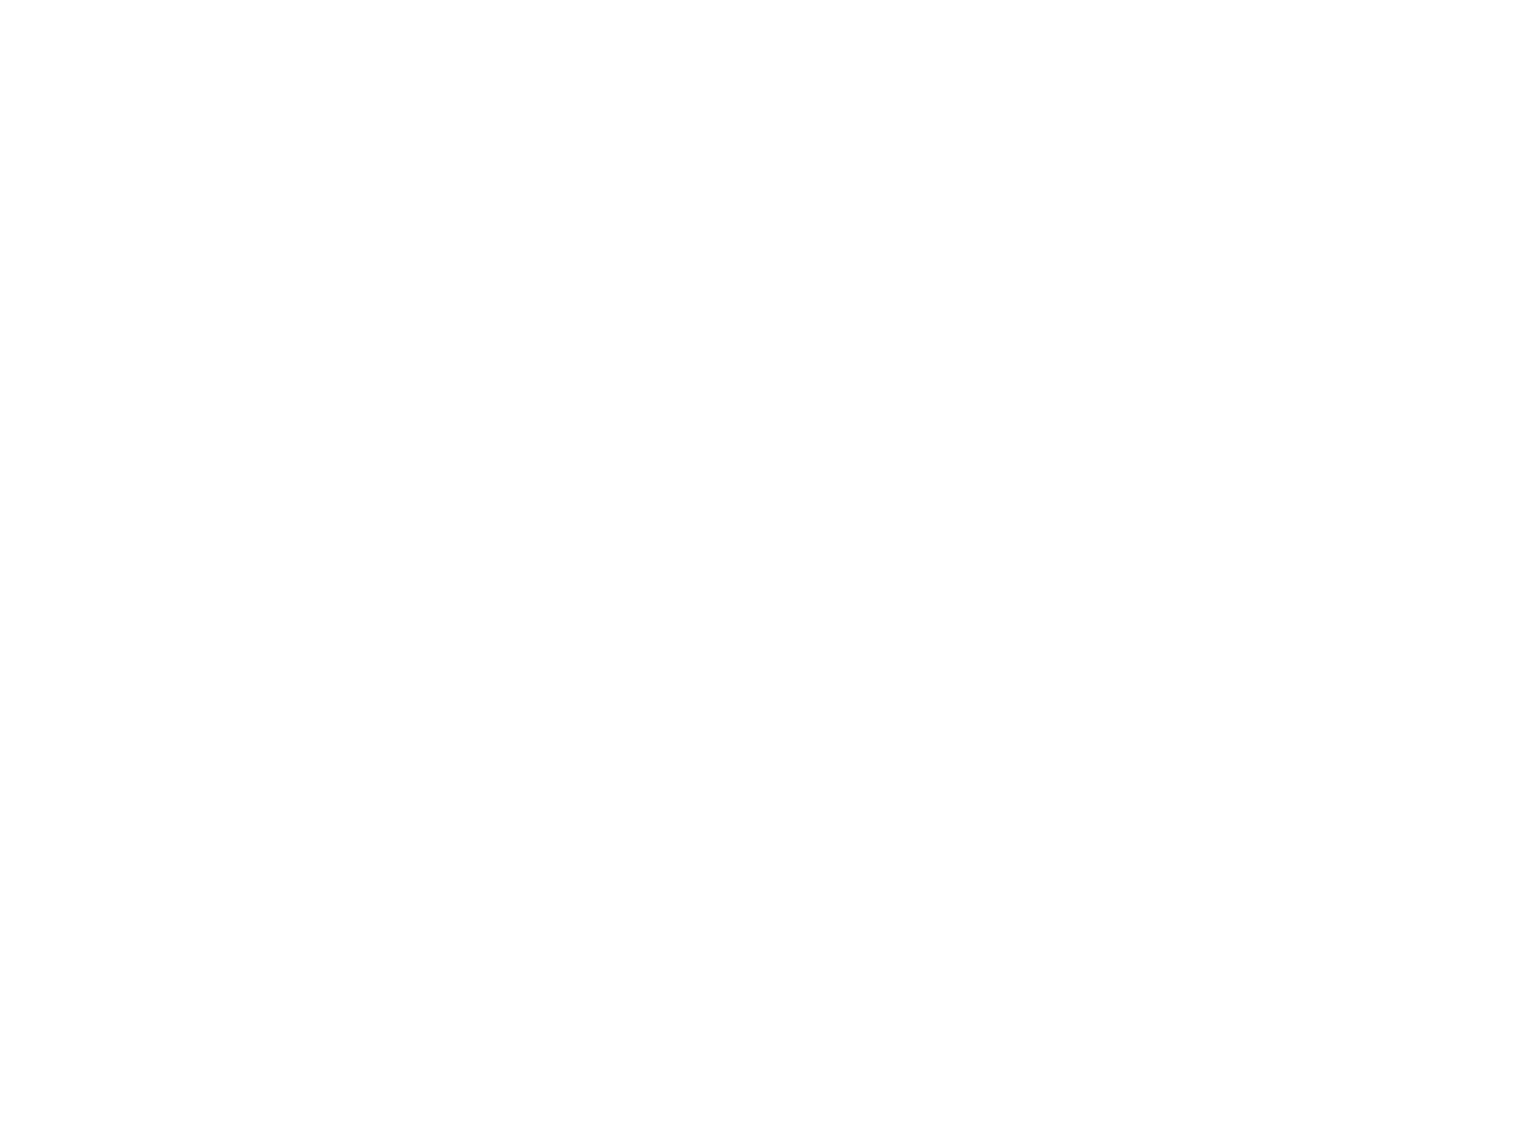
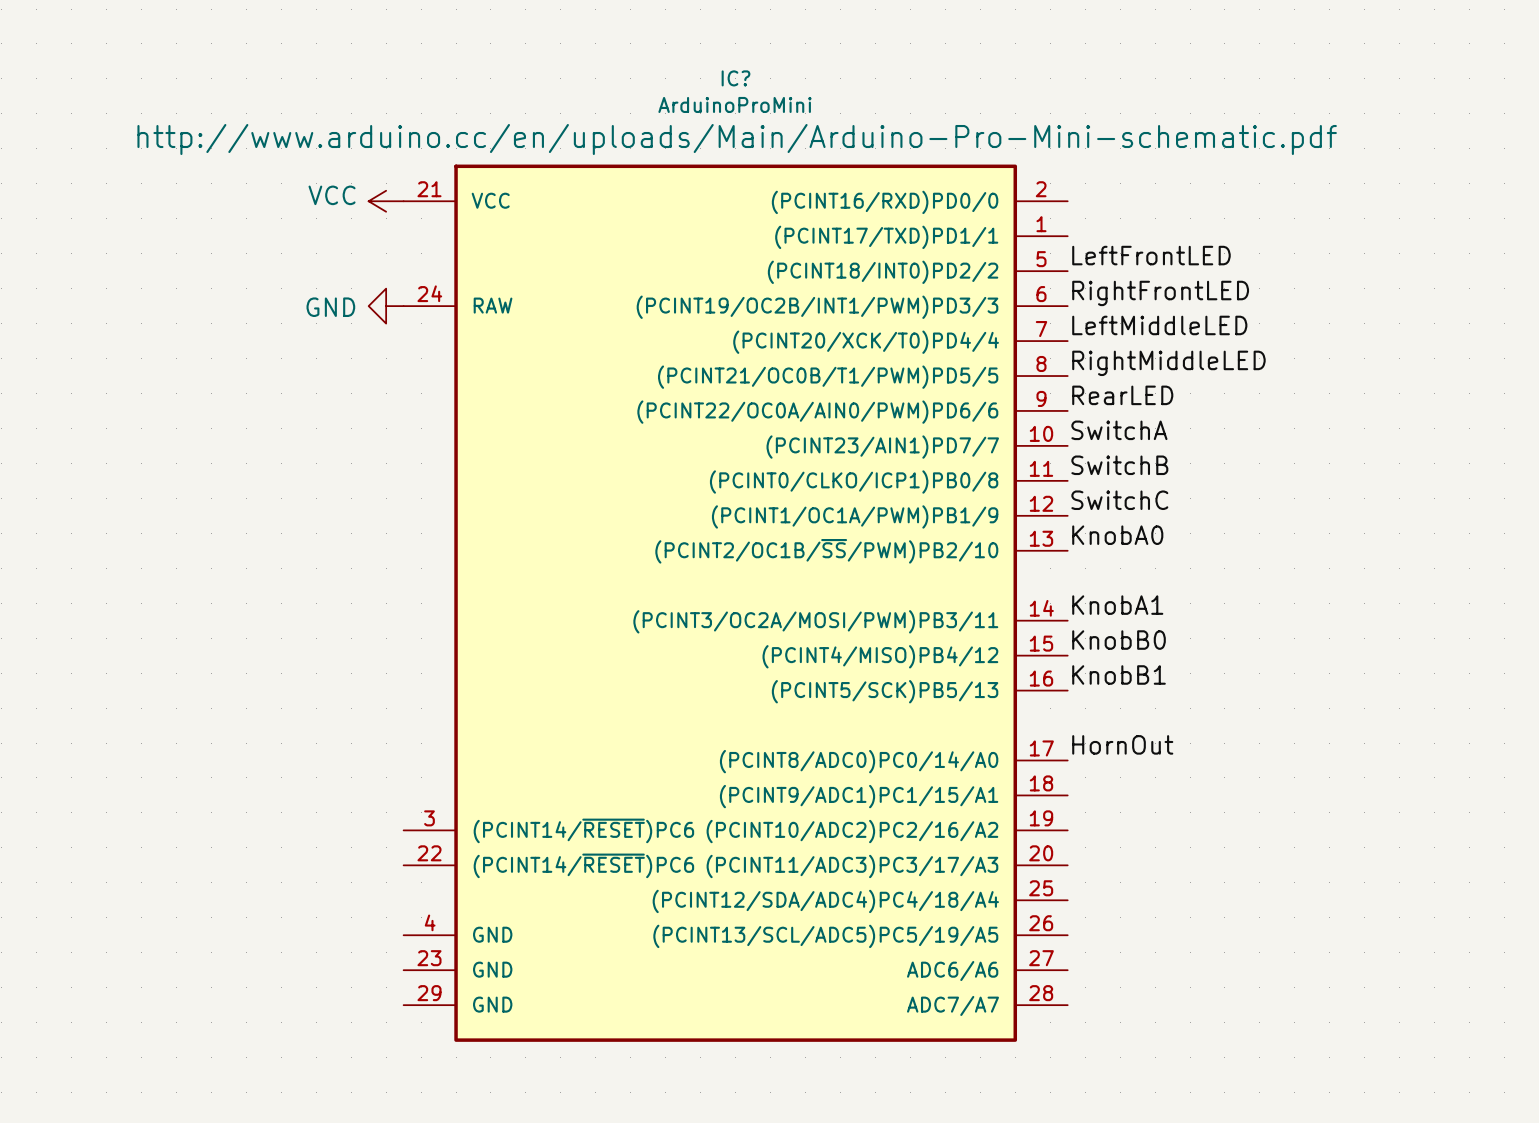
power symbol: none -> VCC (386, 201)
label: none -> LeftFrontLED (1151, 255)
label: none -> RightFrontLED (1160, 293)
power symbol: none -> GND (386, 306)
label: none -> LeftMiddleLED (1159, 325)
label: none -> RightMiddleLED (1168, 363)
label: none -> RearLED (1122, 395)
label: none -> SwitchA (1119, 430)
label: none -> SwitchB (1119, 465)
label: none -> SwitchC (1119, 500)
label: none -> KnobA0 (1117, 535)
IC?: none -> ArduinoProMini (735, 603)
label: none -> KnobA1 (1117, 605)
label: none -> KnobB0 (1119, 640)
label: none -> KnobB1 (1119, 674)
label: none -> HornOut (1122, 744)

